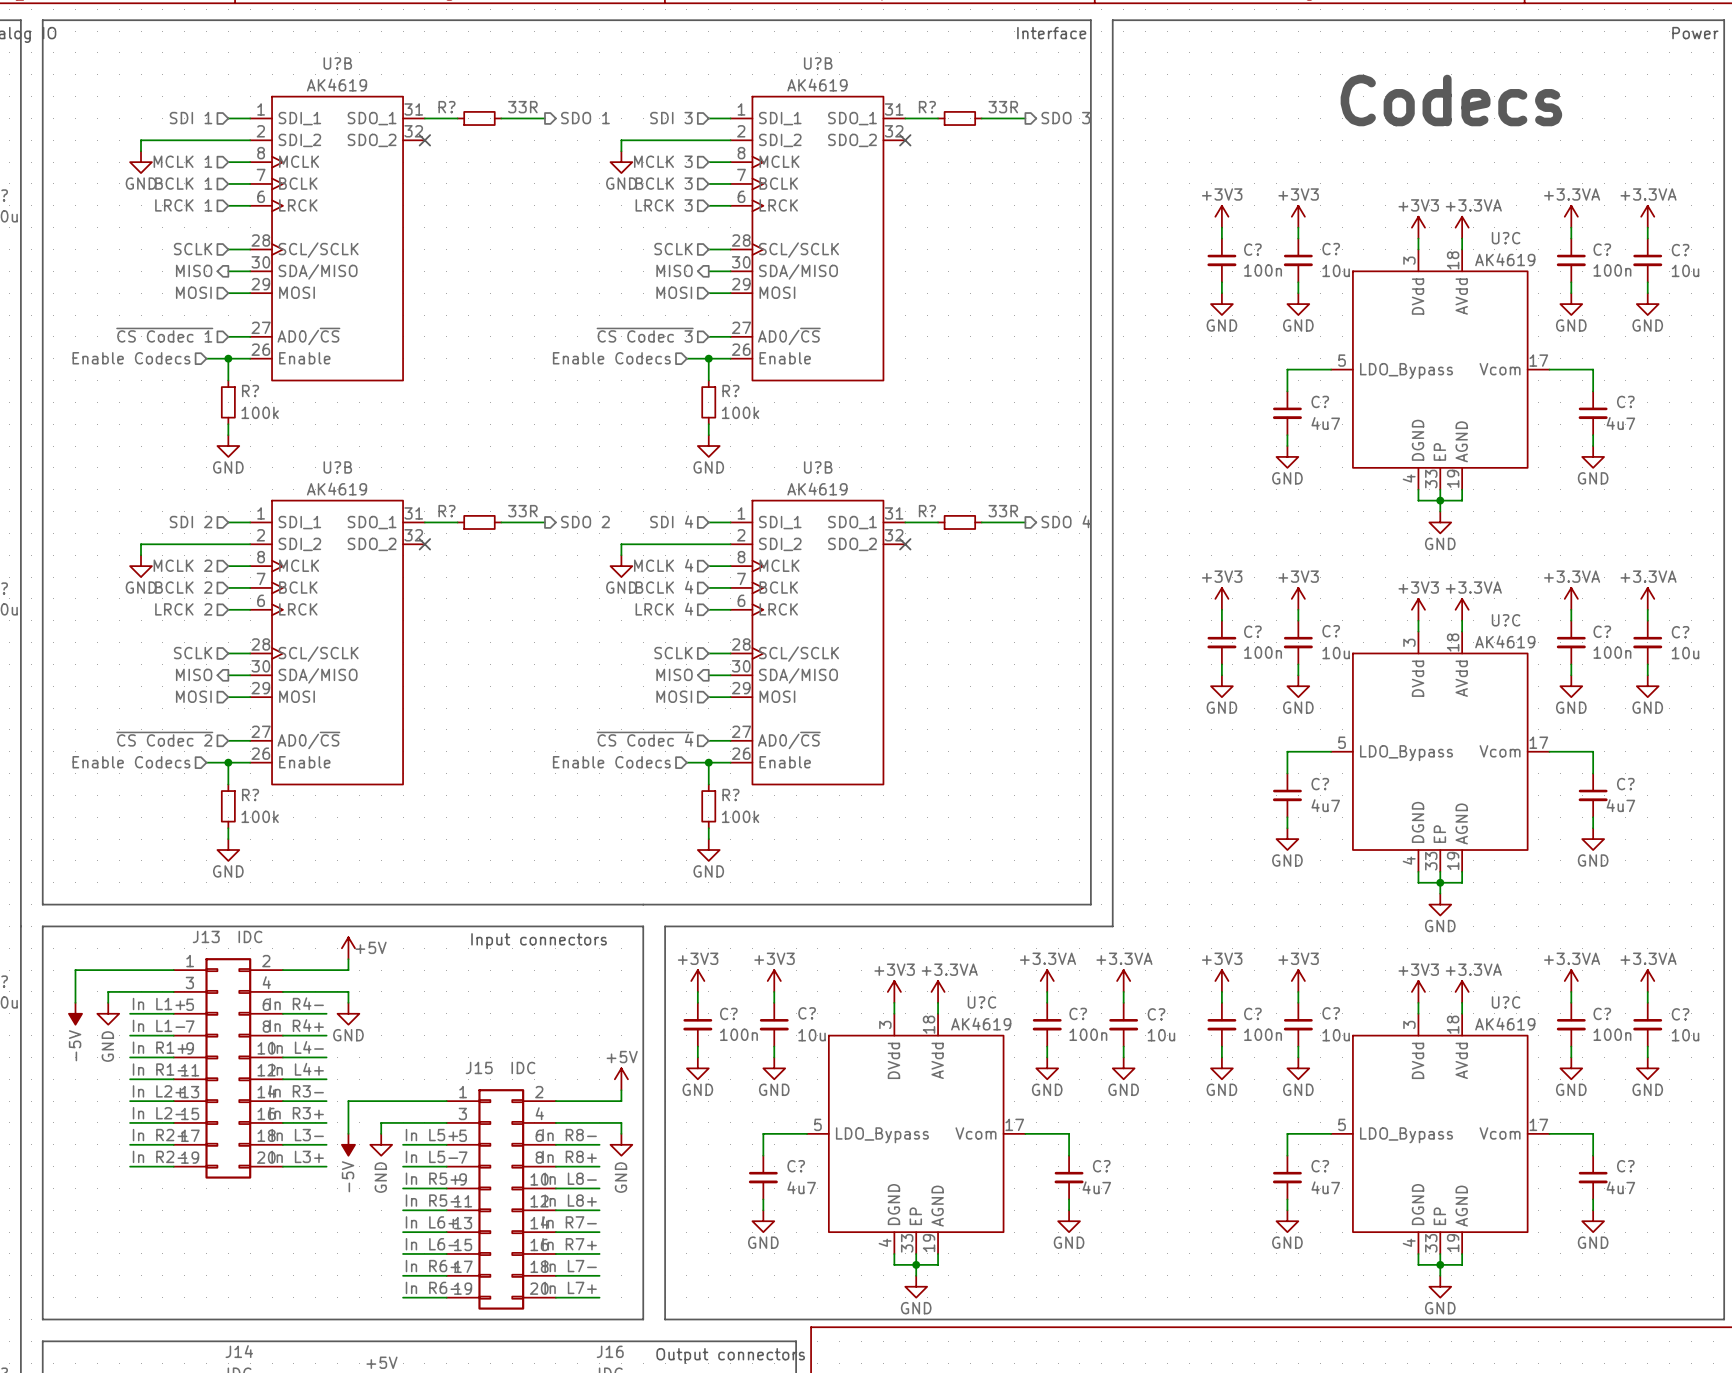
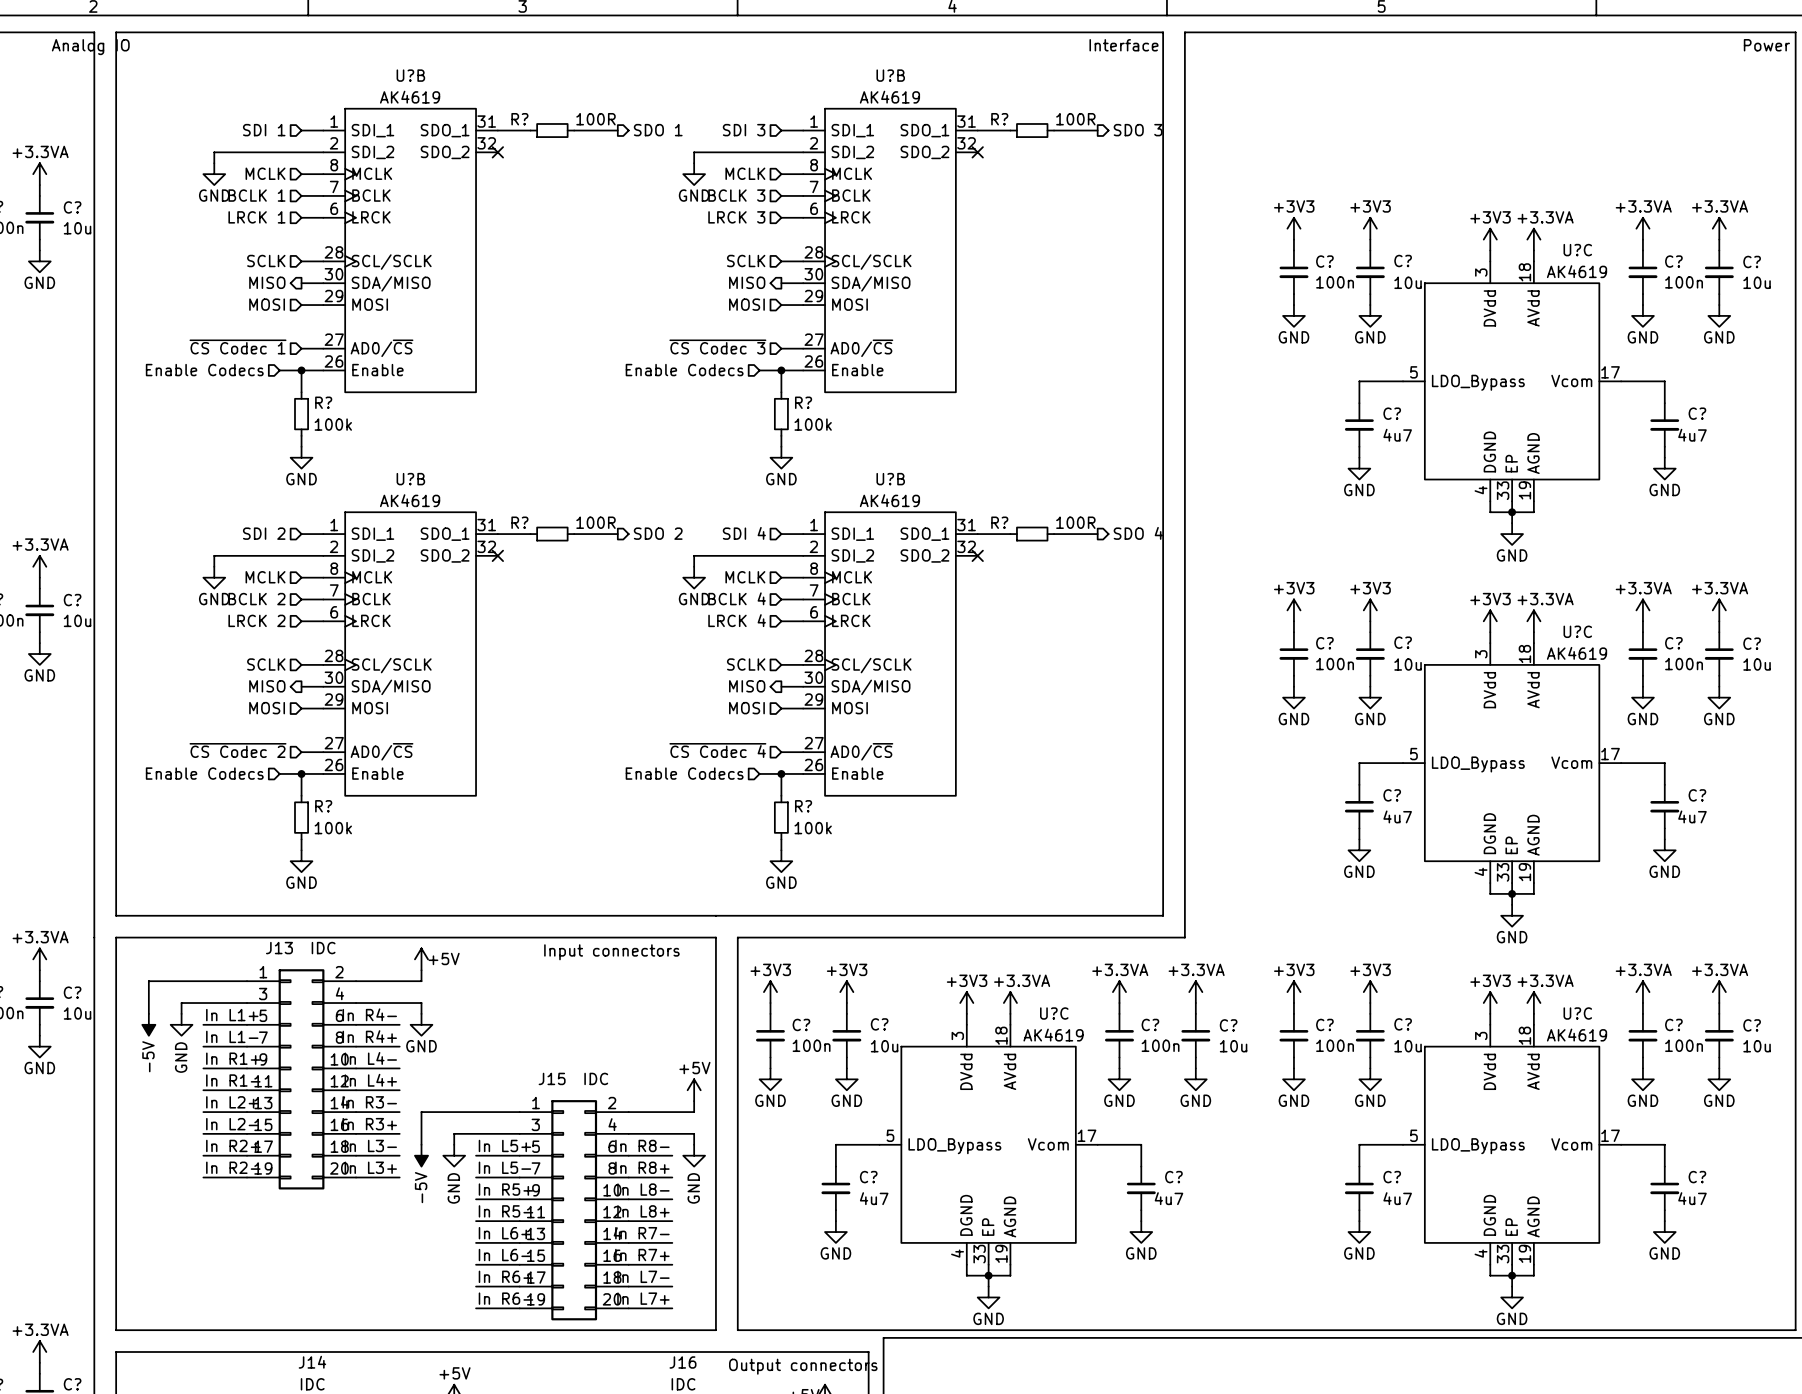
text: Codecs (1451, 100) -> none
R? value: 33R (522, 107) -> 100R (596, 119)
R? value: 33R (1003, 107) -> 100R (1075, 119)
hierarchical label: MCLK 1 (182, 161) -> MCLK (265, 173)
hierarchical label: MCLK 3 (663, 161) -> MCLK (745, 173)
R? value: 33R (522, 511) -> 100R (596, 522)
R? value: 33R (1003, 511) -> 100R (1075, 522)
hierarchical label: MCLK 2 (182, 565) -> MCLK (265, 577)
hierarchical label: MCLK 4 (663, 565) -> MCLK (745, 577)

